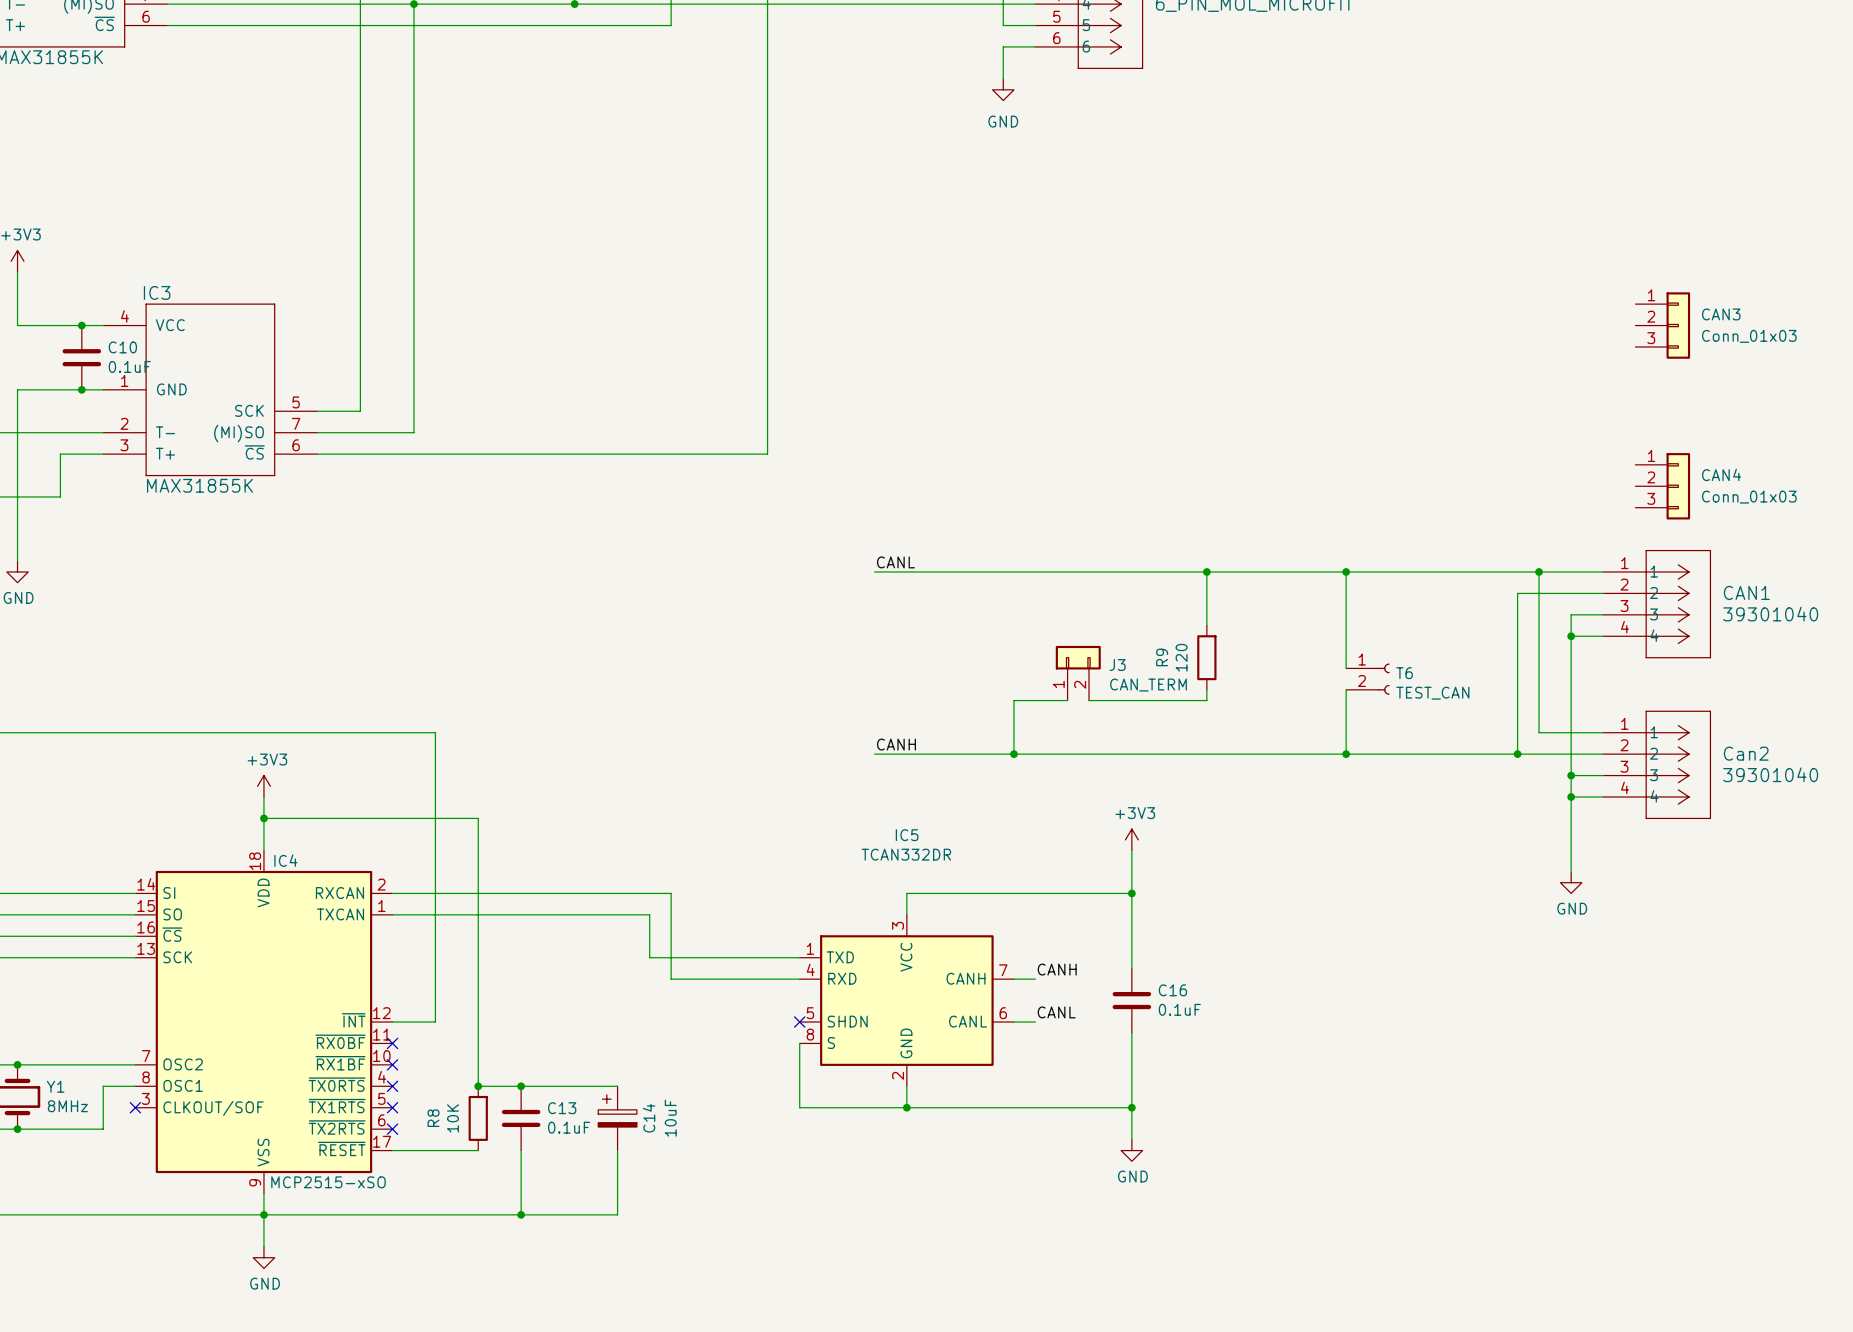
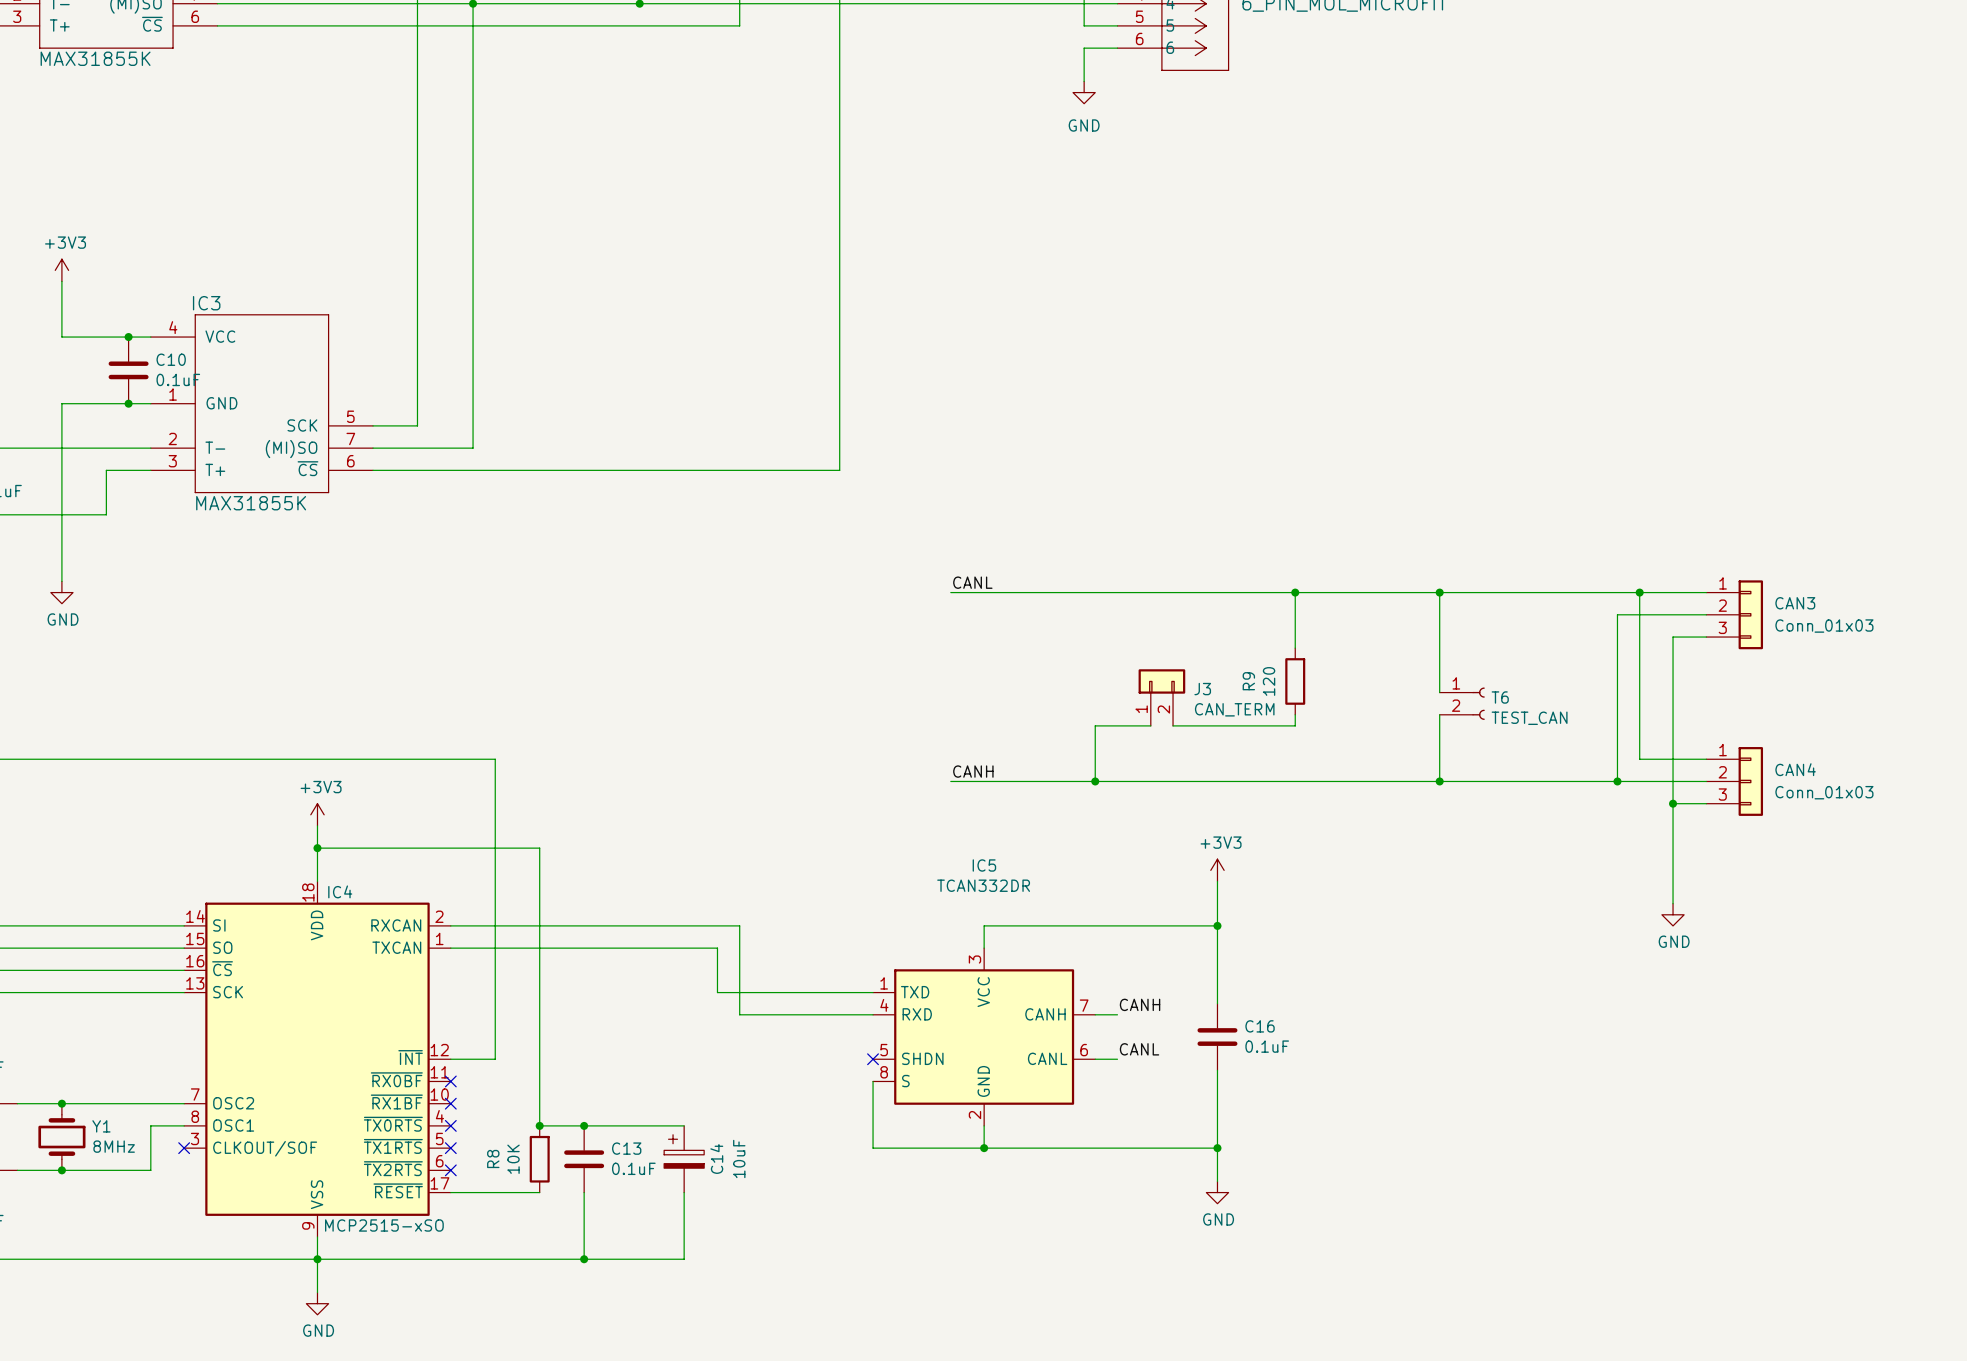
CAN3 position: (1662, 325) -> (1734, 614)
CAN4 position: (1662, 486) -> (1734, 781)
CAN1: 39301040 (1657, 604) -> none
wire: (1571, 636) (1603, 636) -> none
junction: (1571, 636) -> none
Can2: 39301040 (1657, 764) -> none
wire: (1571, 796) (1603, 796) -> none
junction: (1571, 796) -> none

